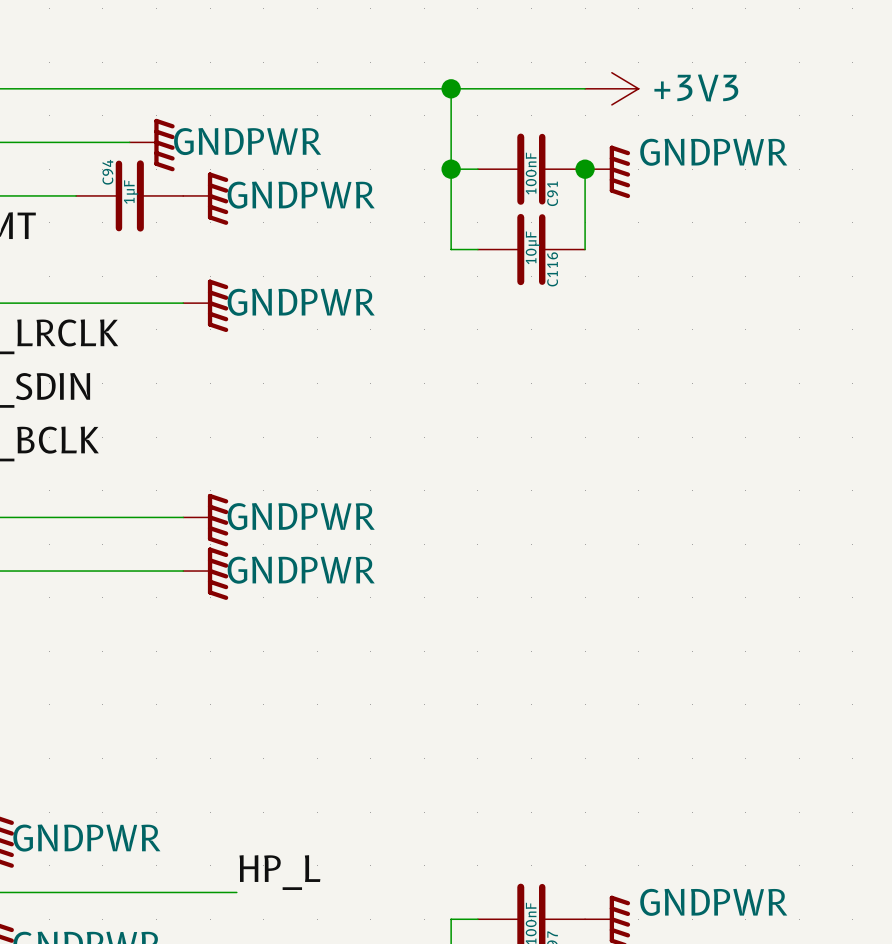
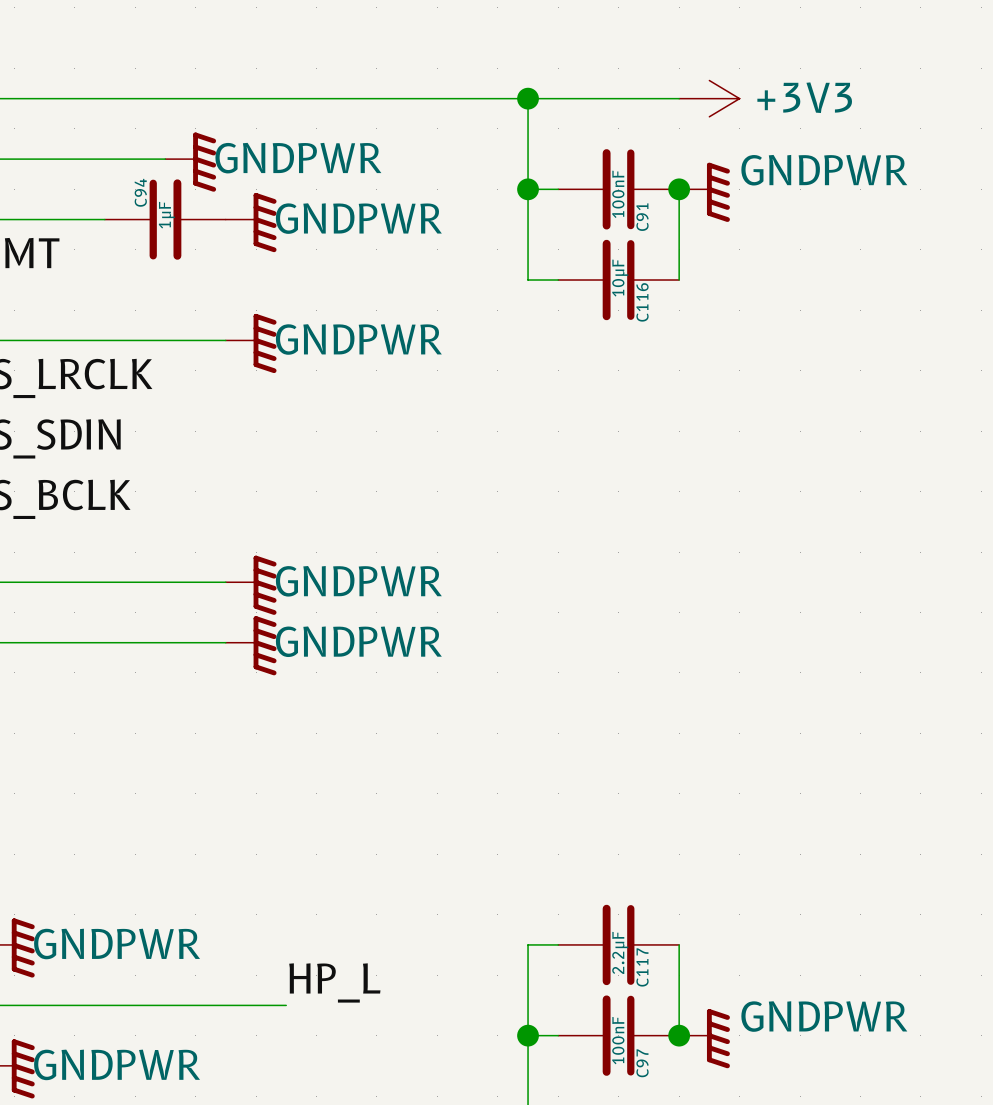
wire: none -> (558, 944) (528, 944) (528, 1035)
C117: none -> 2.2μF (618, 944)
wire: none -> (679, 944) (679, 1035)
junction: none -> (528, 1035)
junction: none -> (679, 1035)

